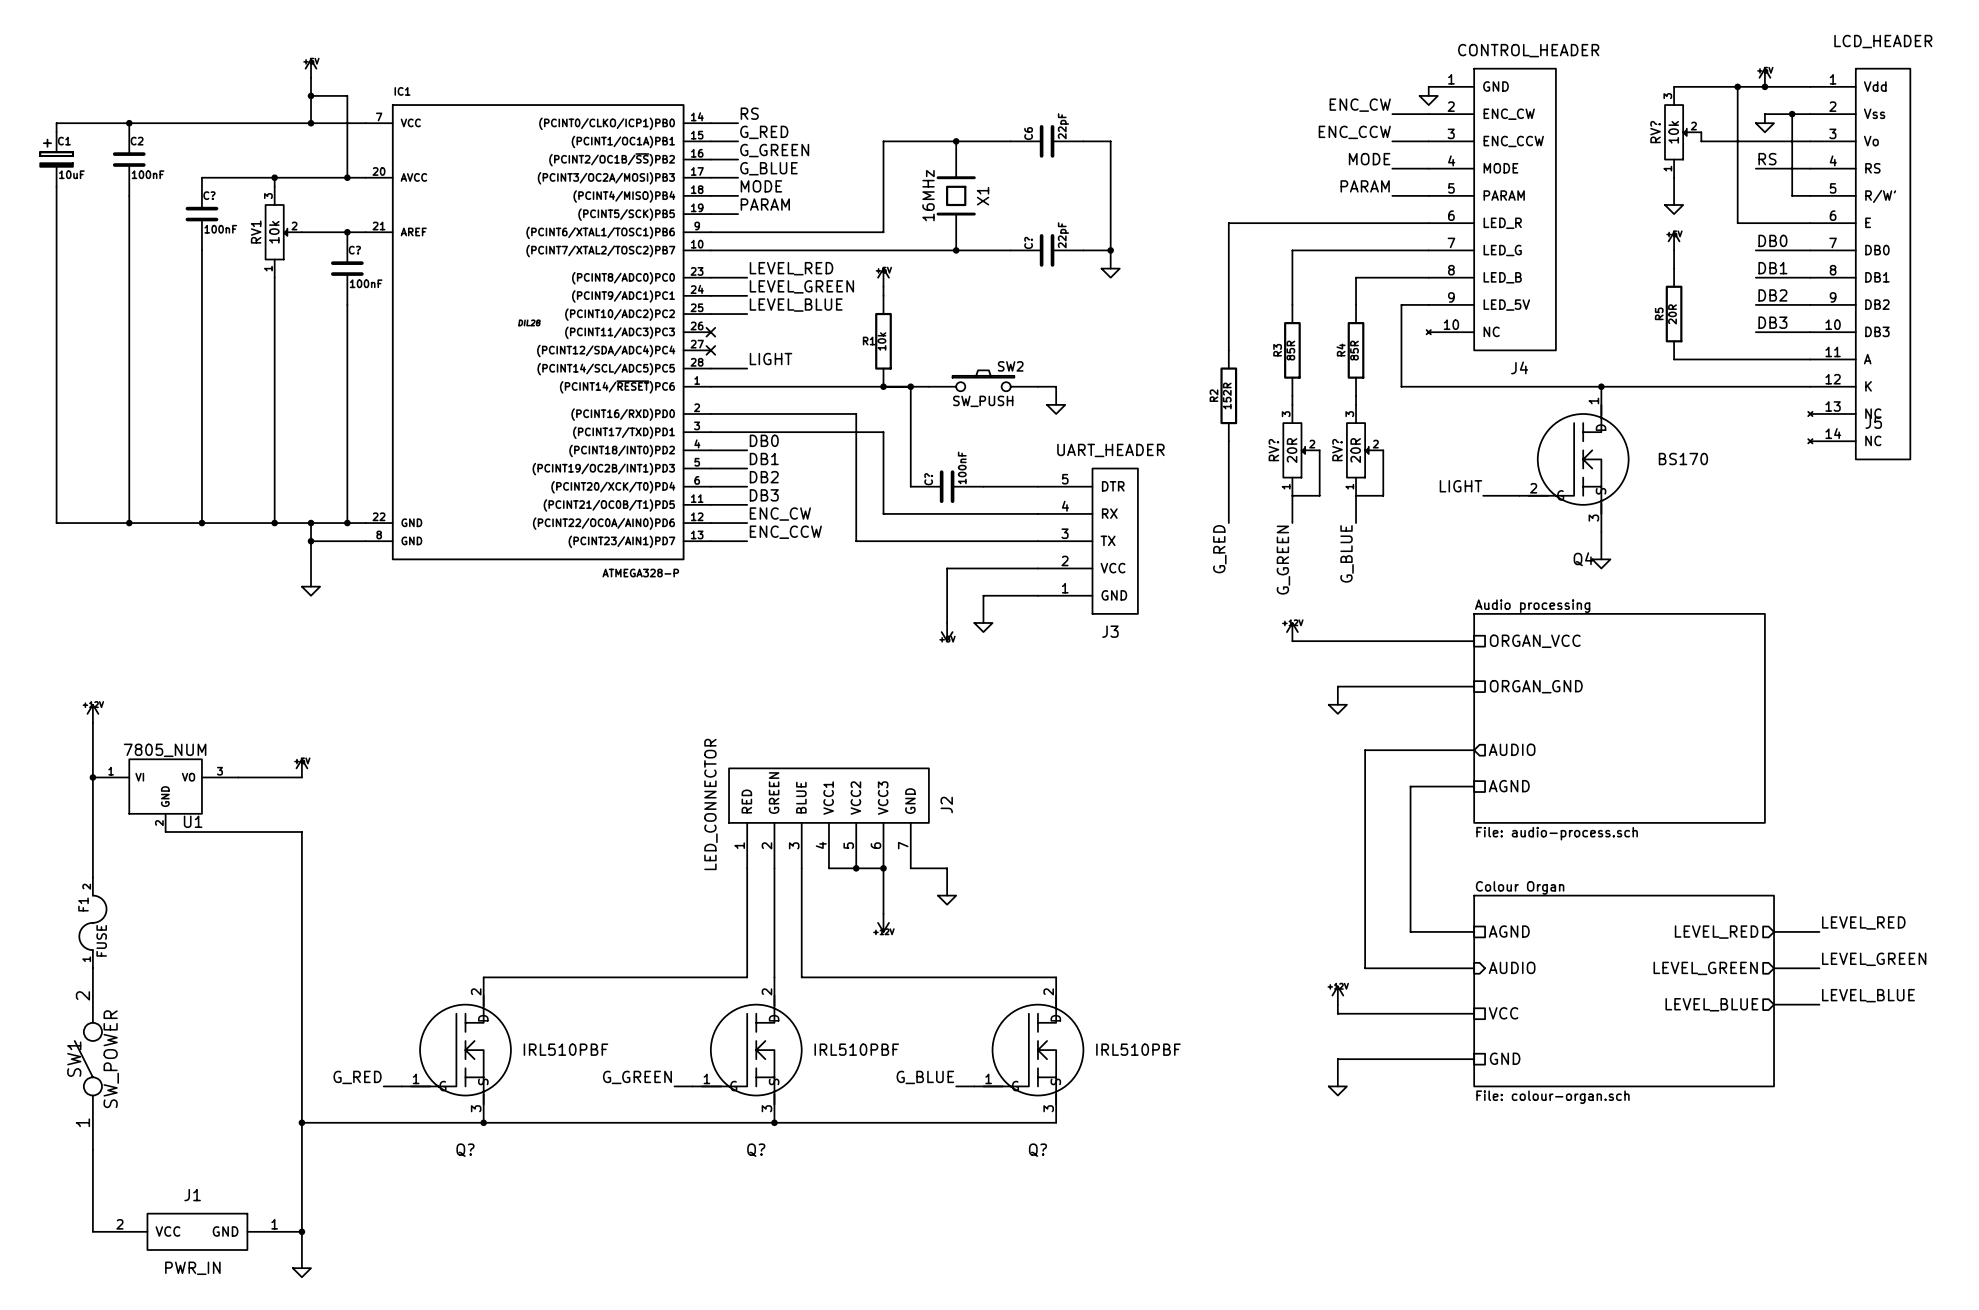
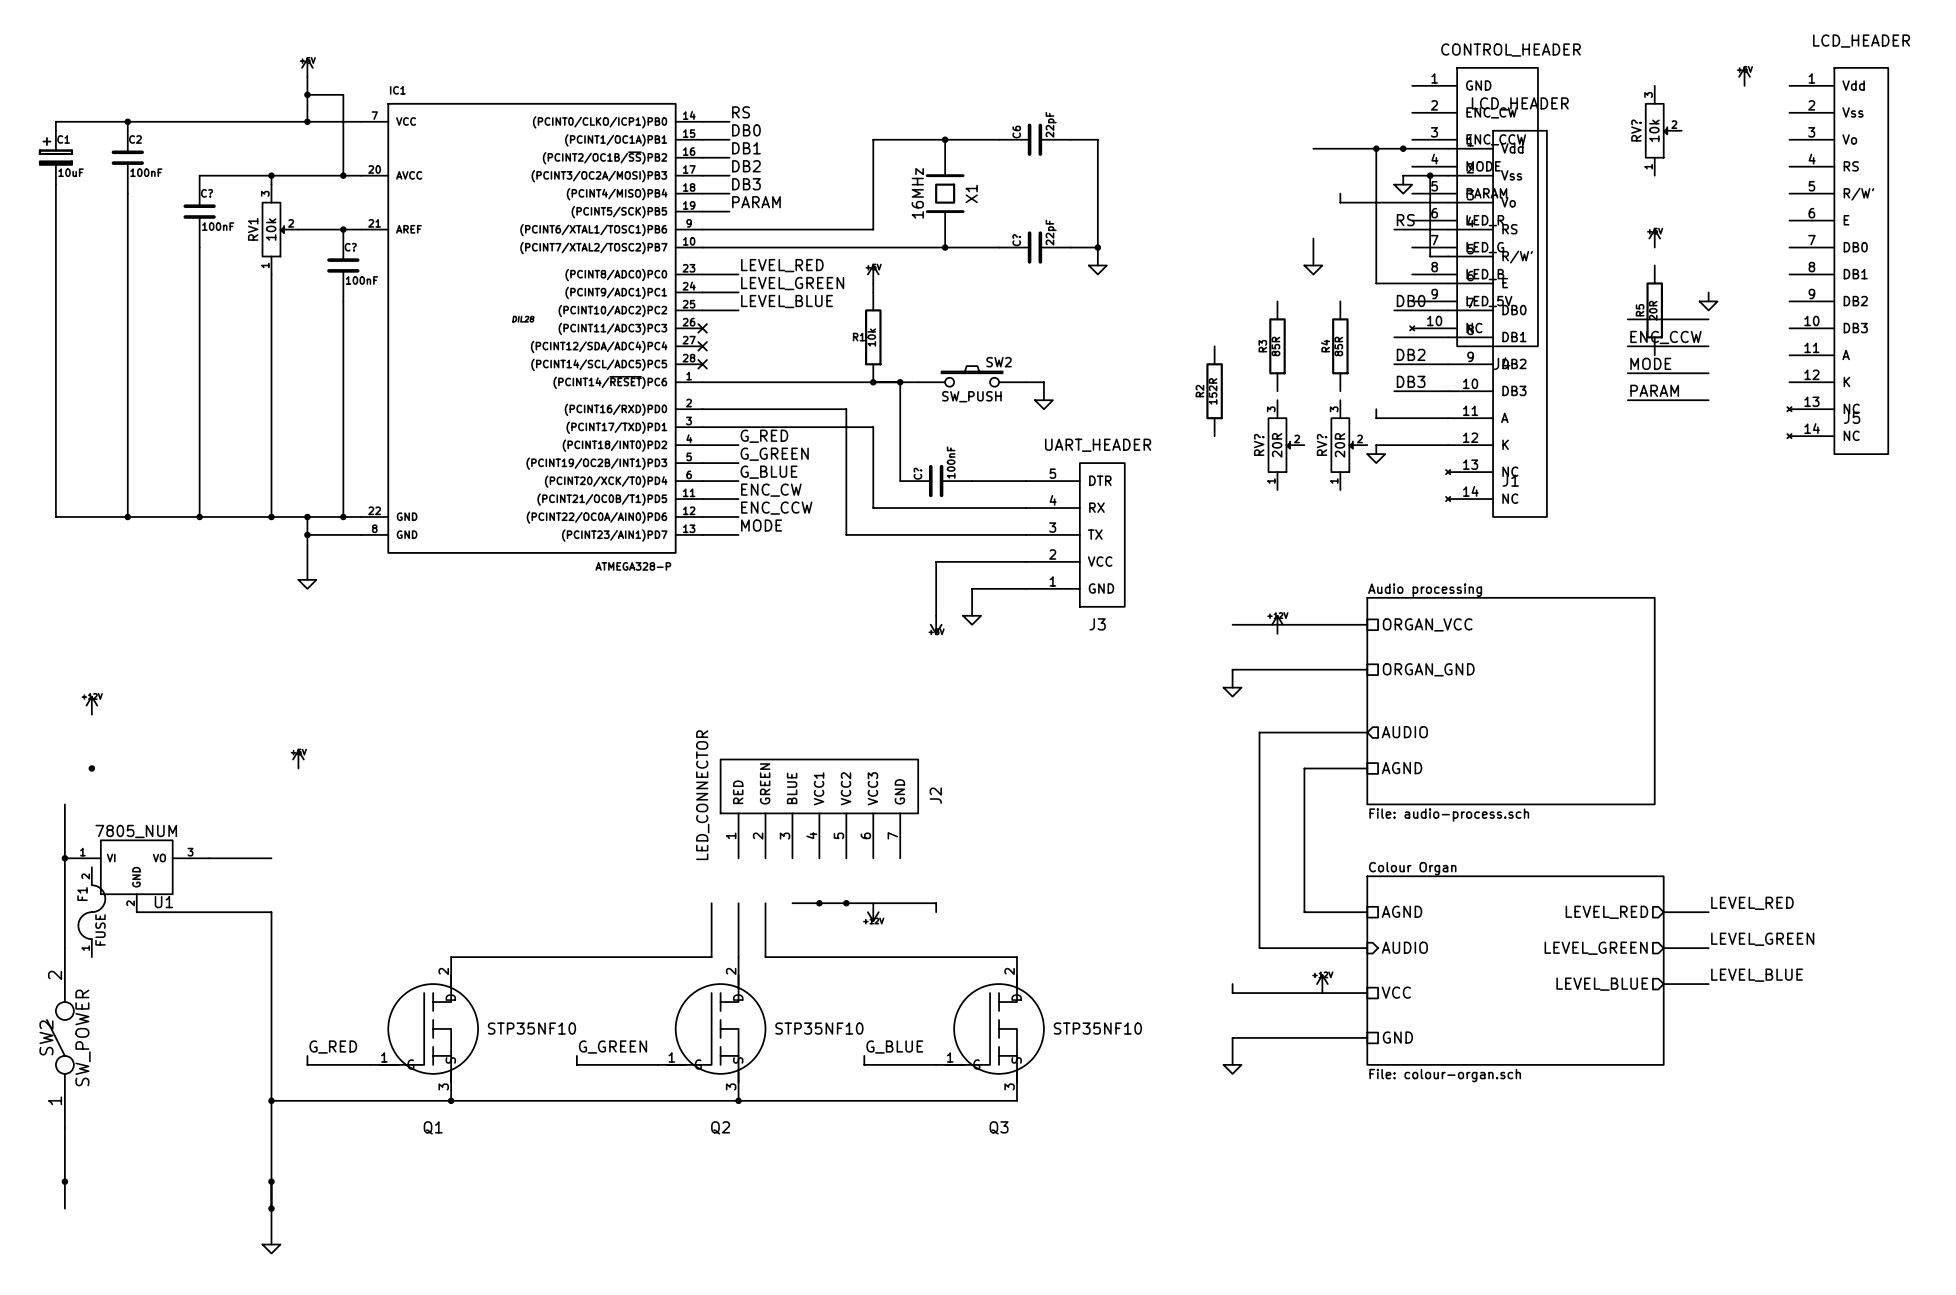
wire: (1428, 86) (1428, 95) -> none
wire: (1674, 86) (1810, 86) -> none
wire: (1737, 86) (1737, 223) (1810, 223) -> none
junction: (1737, 86) -> none
junction: (1764, 86) -> none
power symbol position: (1428, 100) -> (1403, 189)
label: ENC_CW (1360, 105) -> none
wire: (1392, 114) (1428, 114) -> none
wire: (1792, 114) (1792, 195) (1810, 195) -> none
junction: (1792, 114) -> none
wire: (1810, 114) (1764, 114) (1764, 123) -> none
power symbol: (1764, 127) -> none
label: G_RED (764, 132) -> DB0 (746, 130)
label: ENC_CCW (1354, 132) -> none
wire: (1701, 132) (1701, 141) (1810, 141) -> none
wire: (1392, 141) (1428, 141) -> none
label: G_GREEN (774, 150) -> DB1 (746, 148)
wire: none -> (1313, 148) (1448, 148)
wire: none -> (1376, 148) (1376, 283) (1448, 283)
junction: none -> (1376, 148)
junction: none -> (1403, 148)
label: MODE (1369, 159) -> none
label: RS (1767, 159) -> none
label: G_BLUE (768, 168) -> DB2 (746, 166)
wire: (1392, 168) (1428, 168) -> none
wire: (1755, 168) (1810, 168) -> none
wire: none -> (1430, 175) (1430, 256) (1448, 256)
junction: none -> (1430, 175)
wire: none -> (1448, 175) (1403, 175) (1403, 184)
wire: (1674, 177) (1674, 204) -> none
label: MODE (761, 186) -> DB3 (746, 184)
label: PARAM (1365, 186) -> none
wire: none -> (1340, 193) (1340, 202) (1448, 202)
wire: (1392, 195) (1428, 195) -> none
power symbol: (1674, 209) -> none
label: none -> RS (1405, 220)
wire: (1428, 223) (1228, 223) (1228, 350) -> none
wire: none -> (1394, 229) (1448, 229)
label: DB0 (1772, 240) -> none
wire: none -> (1313, 238) (1313, 265)
wire: (1428, 250) (1292, 250) (1292, 304) -> none
wire: (1674, 250) (1674, 268) -> none
wire: (1755, 250) (1810, 250) -> none
label: DB1 (1772, 268) -> none
power symbol: none -> (1313, 269)
wire: (1428, 277) (1356, 277) (1356, 304) -> none
wire: (1755, 277) (1810, 277) -> none
wire: none -> (1708, 292) (1708, 301)
label: DB2 (1772, 295) -> none
label: none -> DB0 (1411, 301)
wire: (1428, 304) (1401, 304) (1401, 386) (1810, 386) -> none
wire: (1755, 304) (1810, 304) -> none
power symbol: none -> (1708, 305)
wire: none -> (1394, 310) (1448, 310)
label: DB3 (1772, 322) -> none
wire: none -> (1627, 319) (1708, 319)
wire: (1755, 332) (1810, 332) -> none
wire: none -> (1394, 337) (1448, 337)
label: none -> ENC_CCW (1665, 337)
wire: none -> (1627, 346) (1708, 346)
label: LIGHT (771, 359) -> none
label: none -> DB2 (1411, 354)
wire: (1674, 359) (1810, 359) -> none
wire: (710, 368) (747, 368) -> none
no-connect mark: none -> (702, 364)
wire: none -> (1394, 364) (1448, 364)
label: none -> MODE (1650, 363)
wire: none -> (1627, 373) (1708, 373)
label: none -> DB3 (1411, 381)
junction: (1601, 386) -> none
wire: (1292, 395) (1292, 404) -> none
wire: (1356, 395) (1356, 404) -> none
wire: none -> (1394, 391) (1448, 391)
label: none -> PARAM (1654, 390)
wire: none -> (1627, 400) (1708, 400)
wire: none -> (1376, 409) (1376, 418) (1448, 418)
label: DB0 (764, 440) -> G_RED (764, 436)
wire: (1228, 441) (1228, 523) -> none
wire: (1319, 450) (1319, 495) (1292, 495) (1292, 523) -> none
wire: (1383, 450) (1383, 495) (1356, 495) (1356, 523) -> none
wire: none -> (1448, 445) (1376, 445) (1376, 454)
label: DB1 (764, 459) -> G_GREEN (774, 454)
Q4: BS170 (1574, 459) -> none
power symbol: none -> (1376, 458)
label: DB2 (764, 477) -> G_BLUE (769, 472)
label: LIGHT (1460, 486) -> none
label: DB3 (764, 495) -> ENC_CW (771, 490)
wire: (1483, 495) (1519, 495) -> none
label: ENC_CW (780, 514) -> ENC_CCW (776, 508)
label: ENC_CCW (785, 532) -> MODE (761, 525)
wire: (1601, 532) (1601, 559) -> none
label: G_RED (1219, 549) -> none
label: G_BLUE (1347, 553) -> none
label: G_GREEN (1283, 560) -> none
power symbol: (1601, 563) -> none
wire: none -> (1232, 624) (1367, 624)
wire: (1292, 641) (1474, 641) -> none
sheet pin position: ORGAN_VCC (1535, 641) -> ORGAN_VCC (1427, 624)
wire: (1474, 686) (1337, 686) (1337, 704) -> (1367, 669) (1232, 669) (1232, 687)
sheet pin position: ORGAN_GND (1536, 686) -> ORGAN_GND (1428, 669)
power symbol position: (1337, 709) -> (1232, 692)
sheet Audio processing position: (1619, 718) -> (1511, 701)
wire: (92, 722) (92, 877) -> none
sheet pin position: AUDIO (1512, 749) -> AUDIO (1404, 732)
wire: (1474, 750) (1365, 750) (1365, 968) (1474, 968) -> (1367, 732) (1259, 732) (1259, 948) (1367, 948)
wire: (238, 777) (301, 777) -> (208, 858) (271, 858)
sheet pin: none -> AGND (1402, 768)
wire: (1474, 786) (1410, 786) (1410, 931) (1474, 931) -> (1367, 768) (1304, 768) (1304, 912) (1367, 912)
sheet pin: AGND (1509, 786) -> none
U1 position: (165, 795) -> (136, 876)
wire: none -> (64, 804) (64, 948)
wire: (165, 831) (301, 831) (301, 1268) -> none
junction: none -> (64, 858)
wire: (747, 868) (747, 913) -> none
wire: (774, 868) (774, 913) -> none
wire: (801, 868) (801, 977) (1056, 977) -> none
wire: (828, 868) (883, 868) (883, 913) -> none
junction: (856, 868) -> none
junction: (883, 868) -> none
wire: (910, 868) (947, 868) (947, 895) -> none
power symbol: (947, 900) -> none
wire: none -> (711, 903) (711, 957) (451, 957)
wire: none -> (792, 903) (936, 903) (936, 912)
junction: none -> (819, 903)
junction: none -> (846, 903)
wire: none -> (136, 912) (271, 912) (271, 1244)
sheet pin: none -> AGND (1402, 911)
label position: LEVEL_RED (1863, 922) -> LEVEL_RED (1752, 903)
sheet pin: AGND (1509, 931) -> none
wire: (1774, 931) (1819, 931) -> (1663, 912) (1708, 912)
sheet pin position: LEVEL_RED (1716, 932) -> LEVEL_RED (1606, 912)
label position: LEVEL_GREEN (1874, 959) -> LEVEL_GREEN (1762, 939)
sheet pin position: AUDIO (1512, 967) -> AUDIO (1404, 947)
wire: (747, 968) (747, 977) (483, 977) -> none
wire: (774, 968) (774, 977) -> (765, 957) (1017, 957)
sheet pin position: LEVEL_GREEN (1705, 968) -> LEVEL_GREEN (1596, 948)
wire: (1774, 968) (1819, 968) -> (1663, 948) (1708, 948)
sheet Colour Organ position: (1624, 991) -> (1515, 970)
label position: LEVEL_BLUE (1868, 995) -> LEVEL_BLUE (1757, 975)
wire: (1337, 1004) (1337, 1013) (1474, 1013) -> (1232, 984) (1232, 993) (1367, 993)
sheet pin position: LEVEL_BLUE (1711, 1004) -> LEVEL_BLUE (1602, 984)
wire: (1774, 1004) (1819, 1004) -> (1663, 984) (1708, 984)
sheet pin position: VCC (1503, 1013) -> VCC (1396, 992)
Q1: none -> STP35NF10 (424, 1028)
Q2: none -> STP35NF10 (711, 1028)
Q3: none -> STP35NF10 (990, 1028)
SW2: none -> SW_POWER (60, 1037)
Q?: IRL510PBF (456, 1050) -> none
Q?: IRL510PBF (747, 1050) -> none
Q?: IRL510PBF (1028, 1050) -> none
sheet pin position: GND (1505, 1058) -> GND (1397, 1037)
SW1: SW_POWER (88, 1059) -> none
wire: (1474, 1059) (1337, 1059) (1337, 1086) -> (1367, 1037) (1232, 1037) (1232, 1064)
wire: none -> (307, 1055) (307, 1064) (370, 1064)
wire: none -> (576, 1055) (576, 1064) (657, 1064)
wire: none -> (864, 1055) (864, 1064) (936, 1064)
label position: G_RED (357, 1077) -> G_RED (333, 1047)
label position: G_GREEN (637, 1077) -> G_GREEN (613, 1047)
label position: G_BLUE (925, 1077) -> G_BLUE (894, 1047)
wire: (383, 1086) (401, 1086) -> none
wire: (674, 1086) (692, 1086) -> none
wire: (956, 1086) (974, 1086) -> none
power symbol position: (1337, 1090) -> (1232, 1069)
wire: (301, 1122) (1056, 1122) -> (271, 1100) (1017, 1100)
junction position: (301, 1122) -> (271, 1100)
junction position: (483, 1122) -> (451, 1100)
junction position: (774, 1122) -> (738, 1100)
wire: (92, 1150) (92, 1231) -> (64, 1127) (64, 1208)
junction: none -> (64, 1181)
J1 name position: J1 (192, 1195) -> J1 (1510, 480)
junction: none -> (271, 1181)
J1 symbol: [92, 1213, 302, 1251] -> [1446, 130, 1547, 517]
junction: none -> (271, 1208)
junction: (301, 1231) -> none
J1 value: PWR_IN (192, 1268) -> LCD_HEADER (1520, 103)
power symbol position: (301, 1272) -> (271, 1249)

